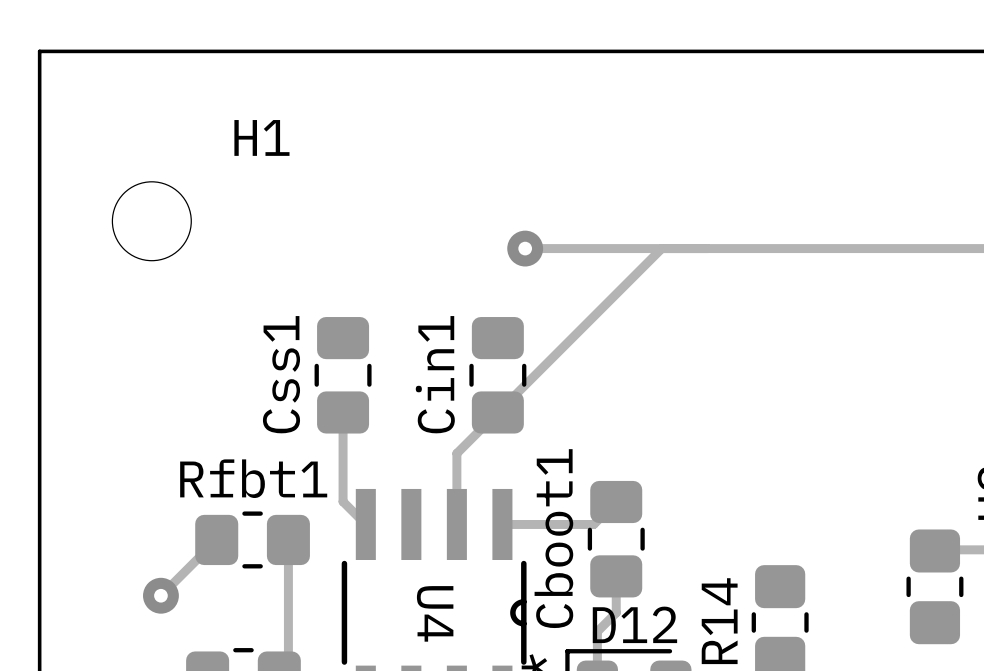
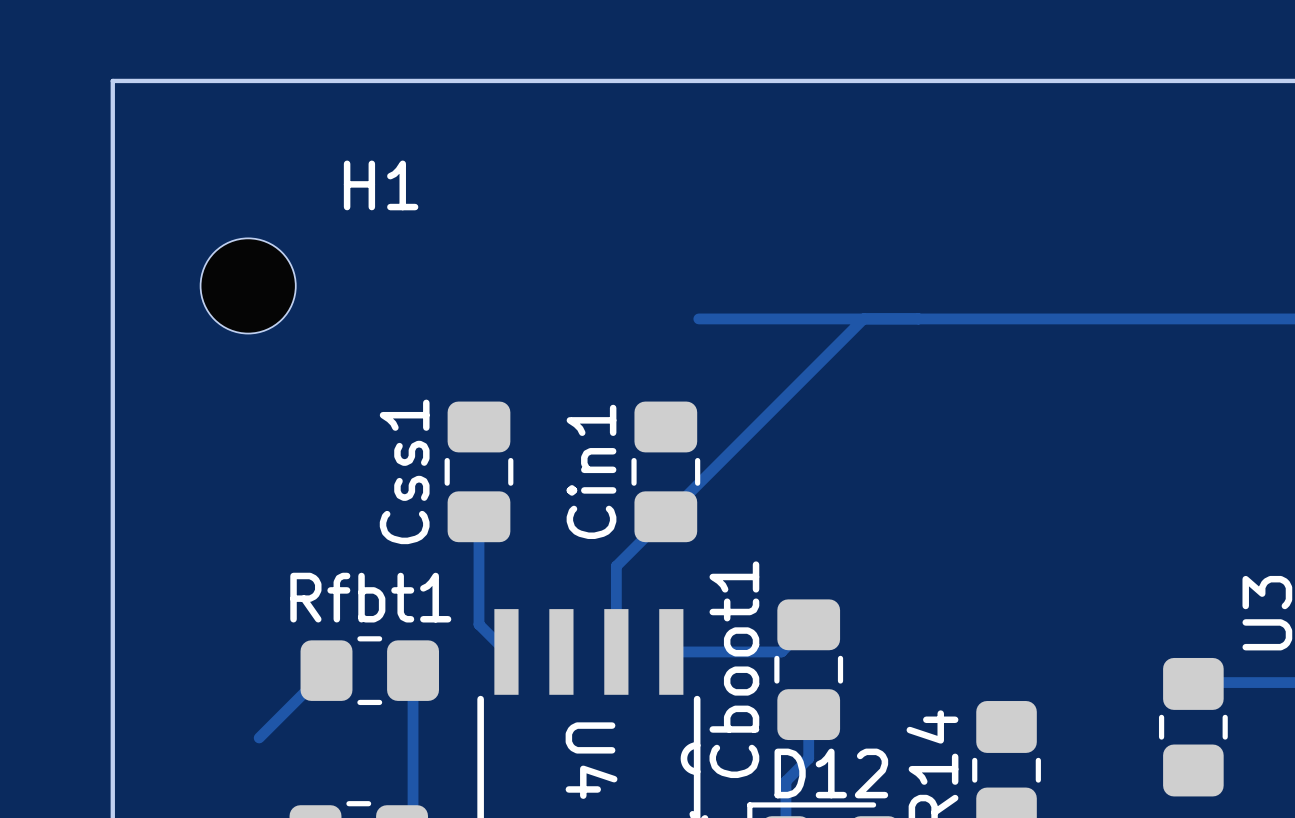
via: (525, 248) -> none
via: (160, 595) -> none

